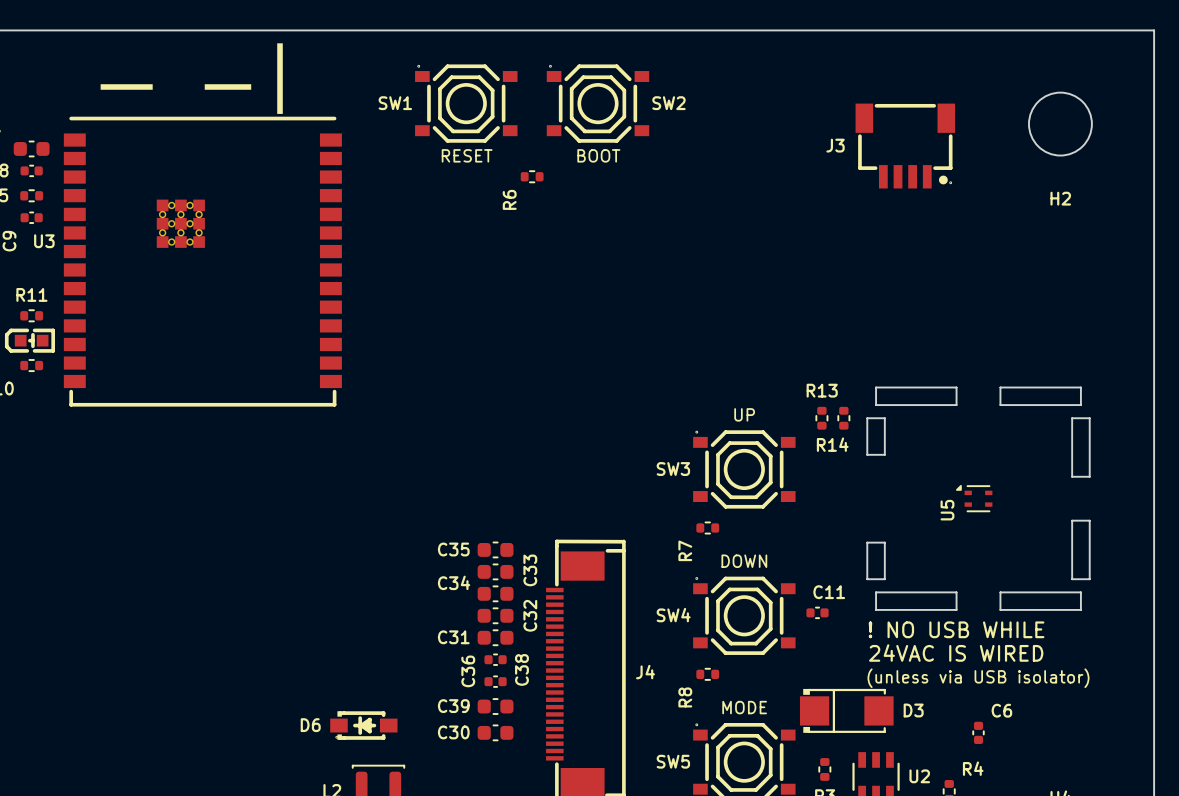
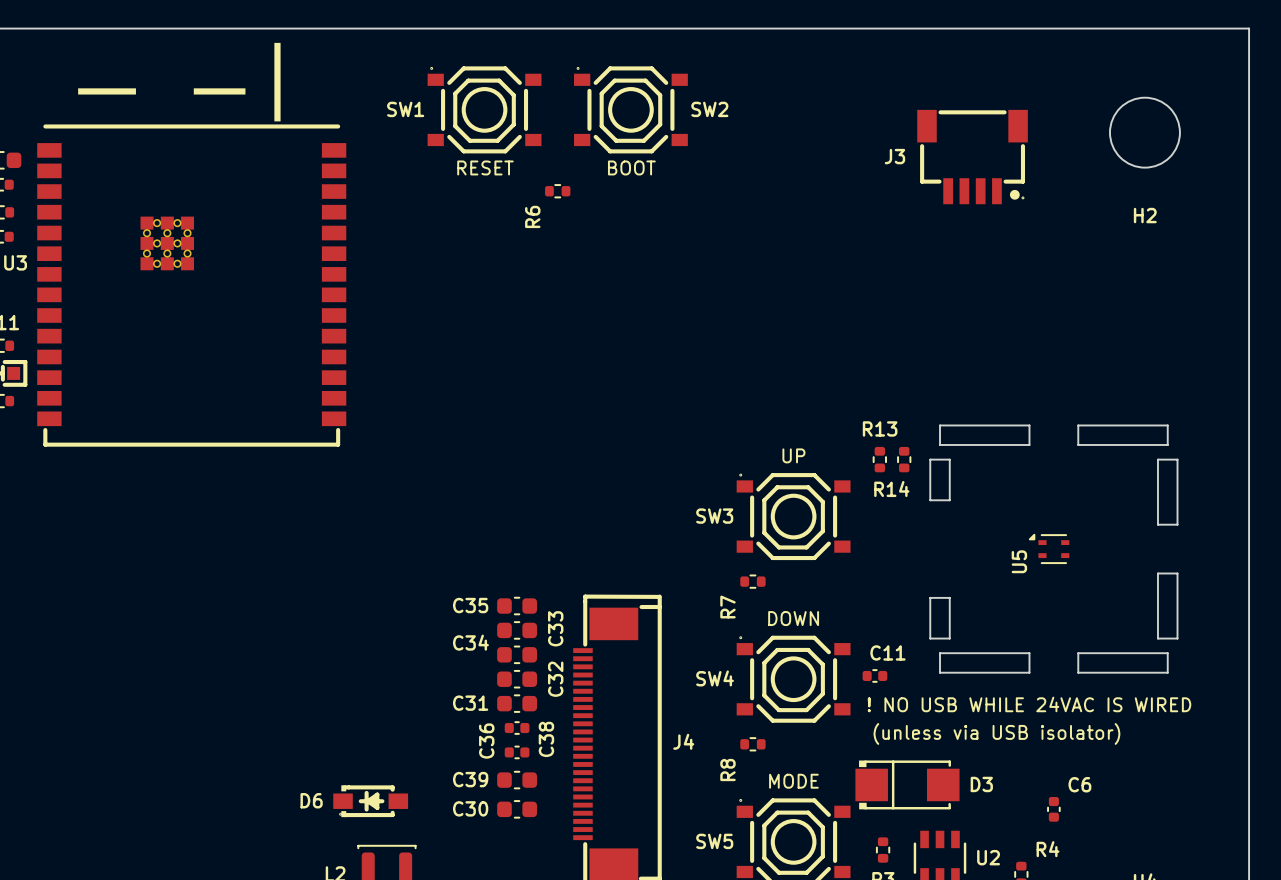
text: ! NO USB WHILE (956, 629) -> none
text: none -> ! NO USB WHILE 24VAC IS WIRED (1029, 704)
text: 24VAC IS WIRED (956, 653) -> none
text position: (unless via USB isolator) (978, 678) -> (unless via USB isolator) (996, 733)

